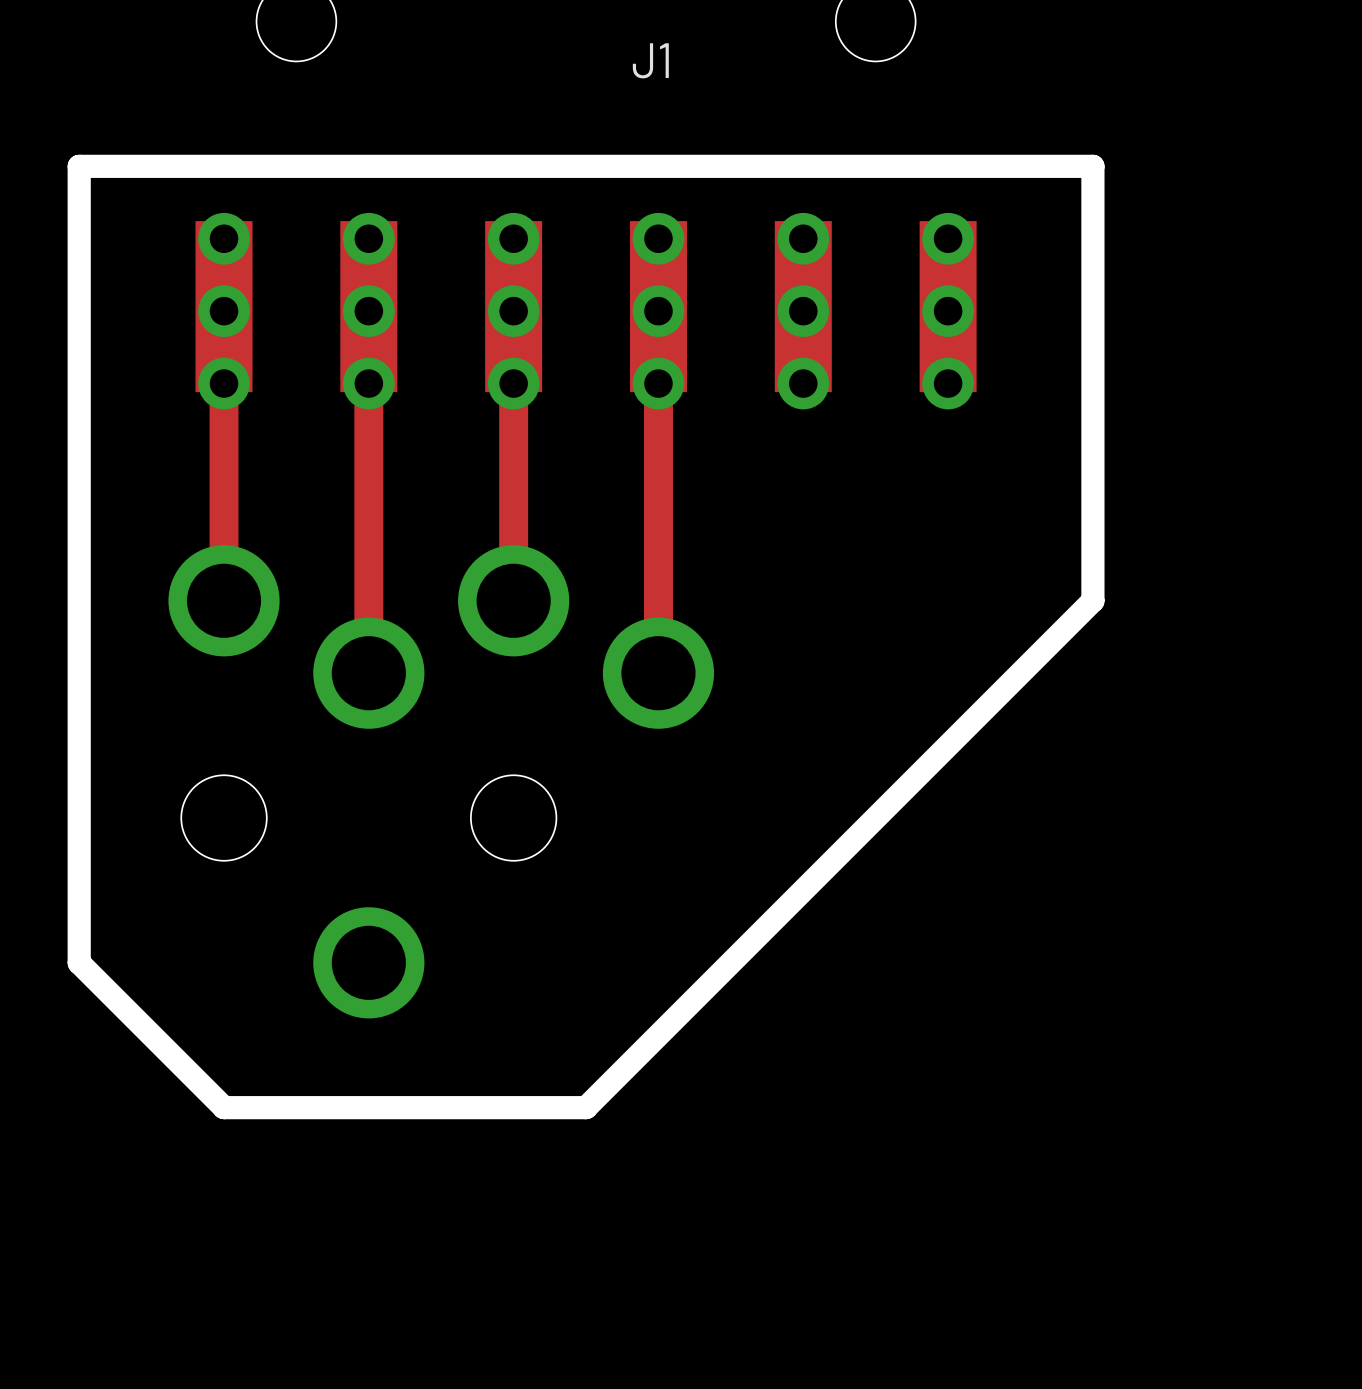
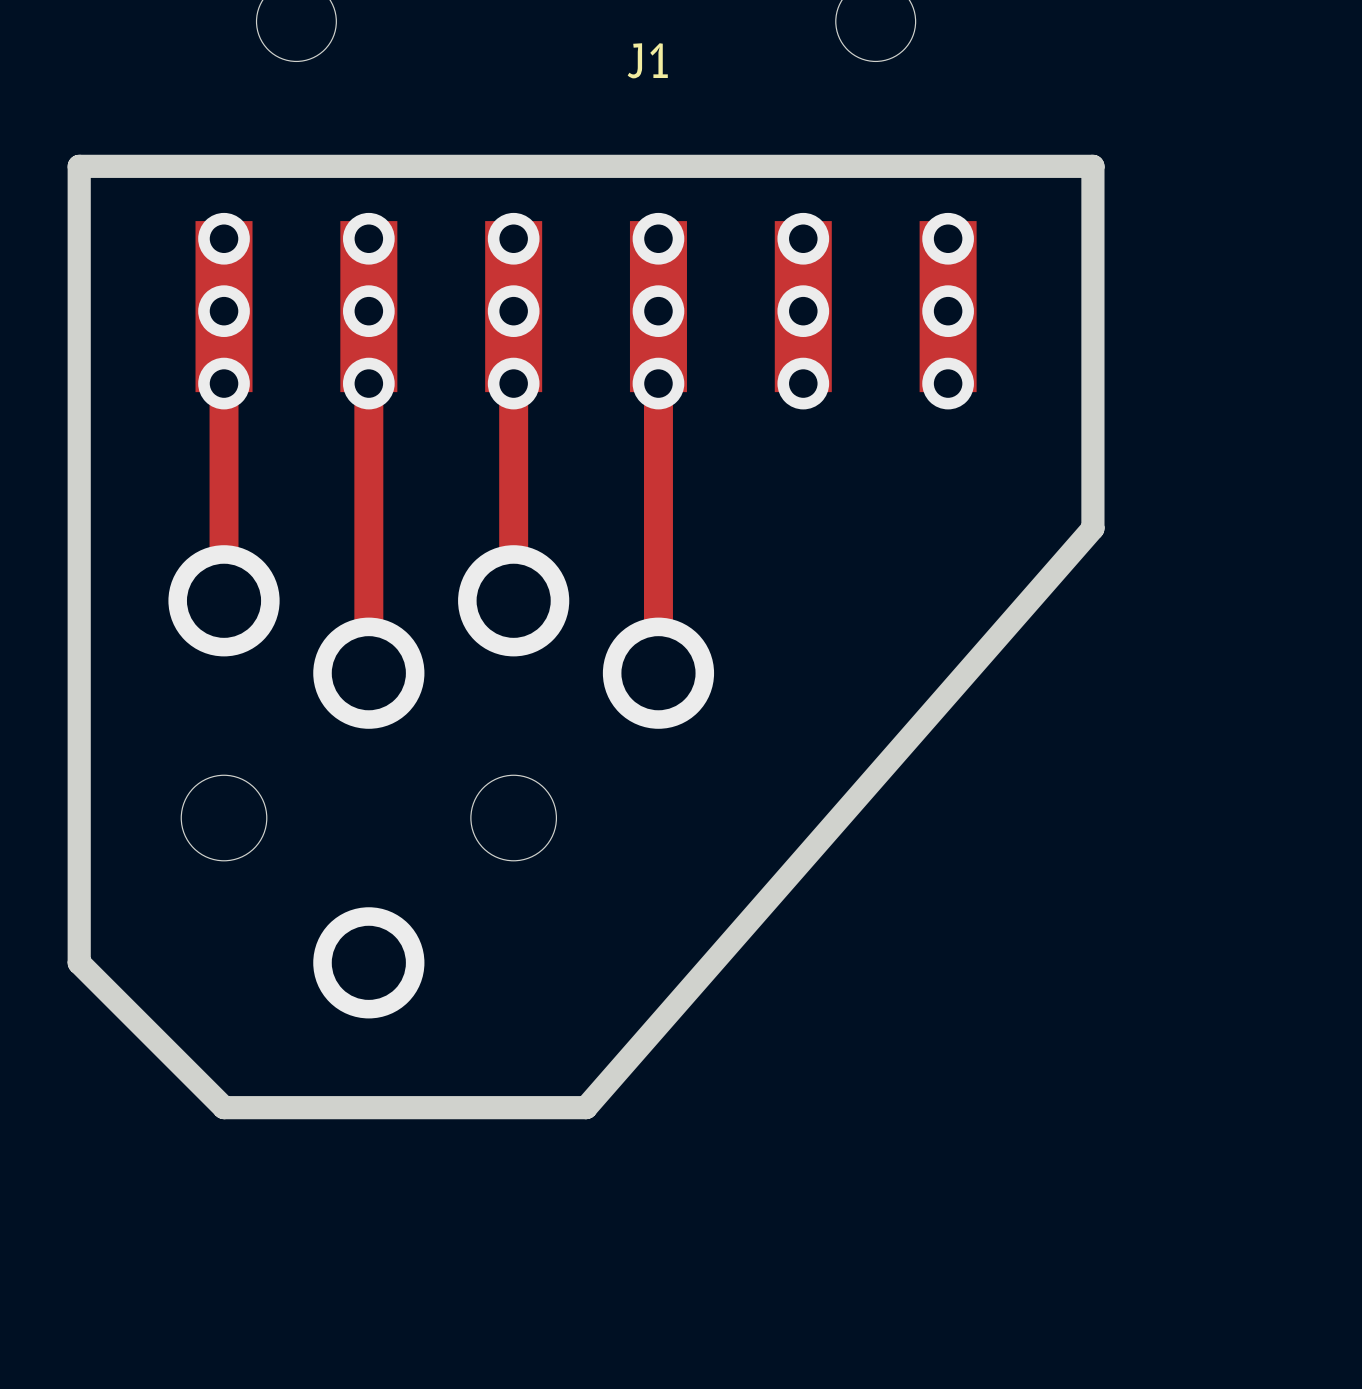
board edge: (1092, 528) (1092, 600) (586, 1107) -> (1092, 528) (586, 1107)

